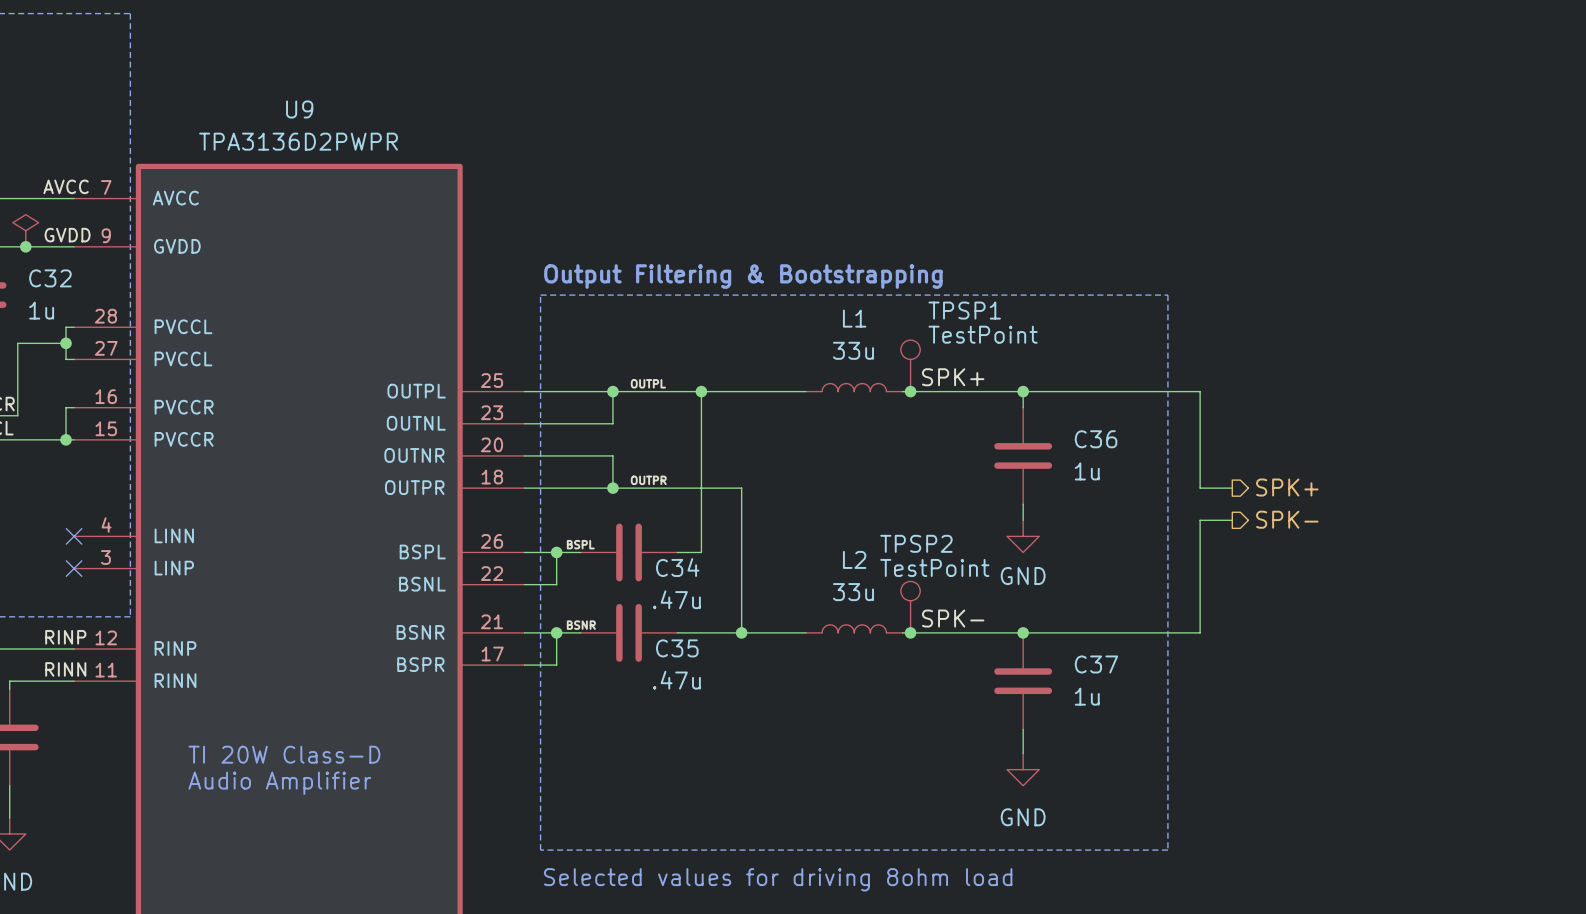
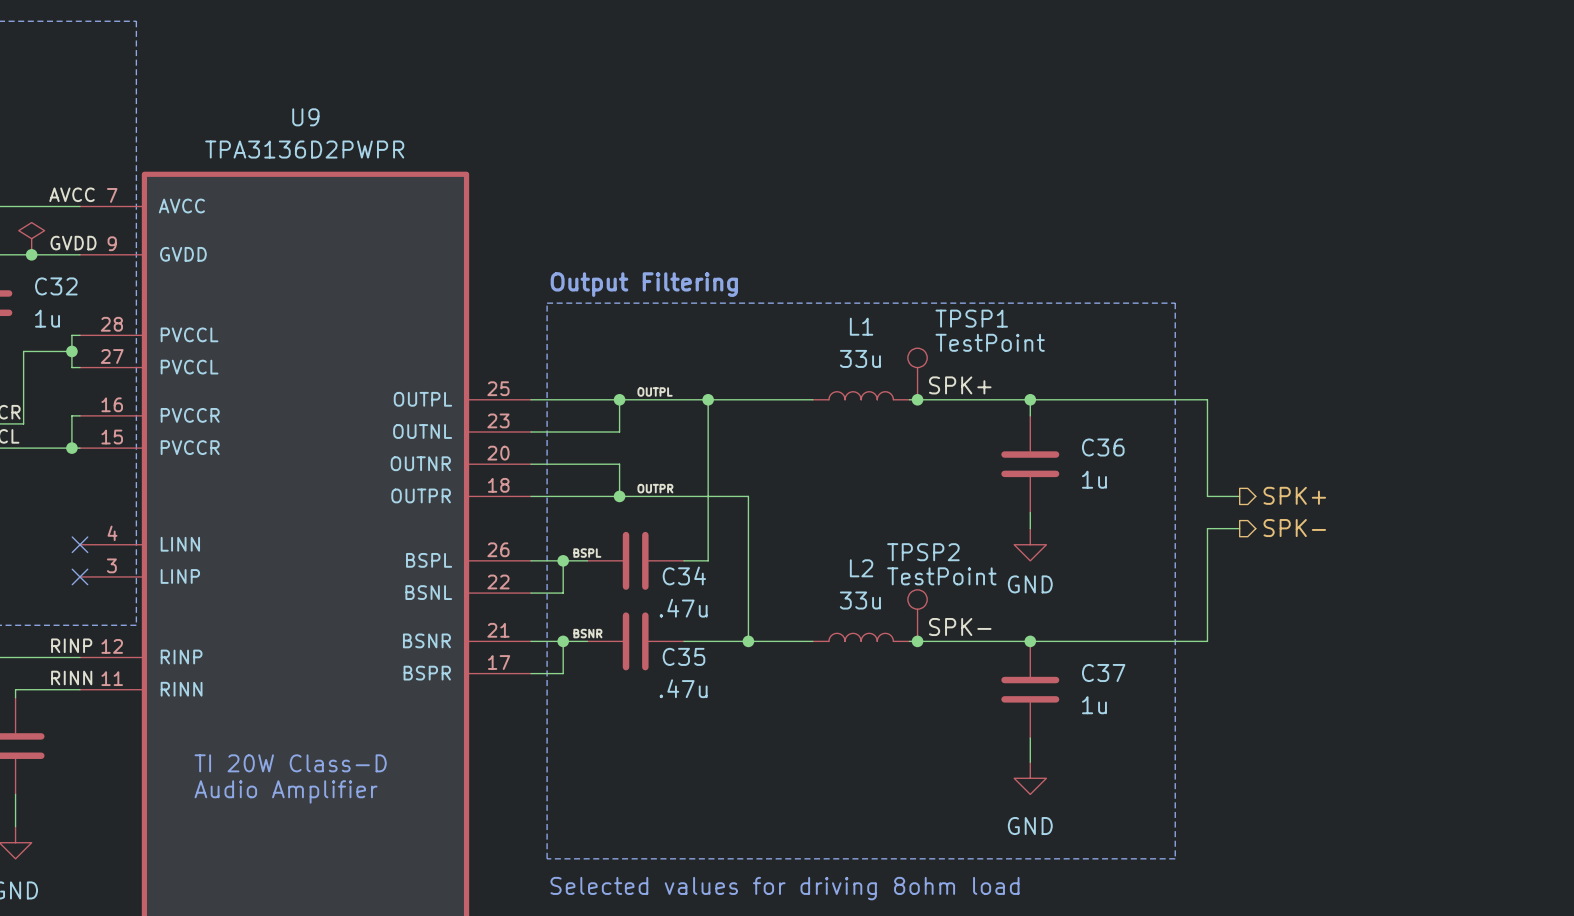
text: Output Filtering & Bootstrapping (743, 276) -> Output Filtering (644, 284)

